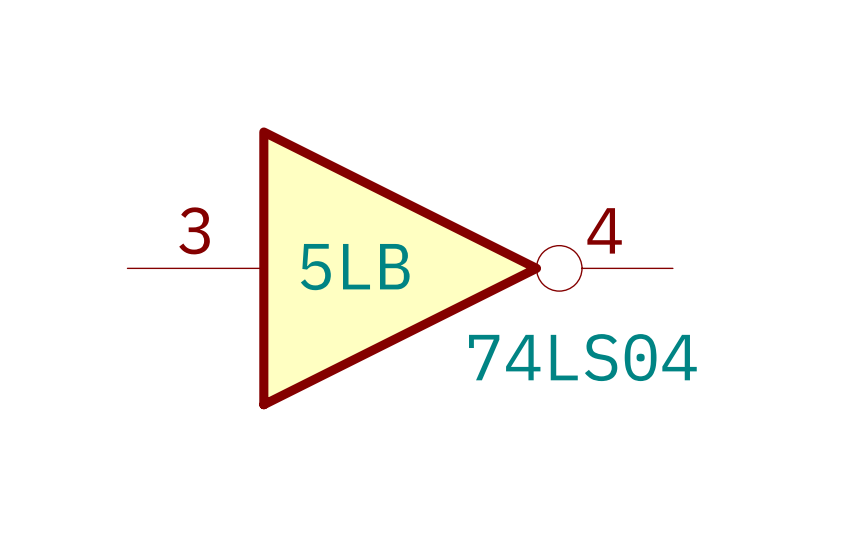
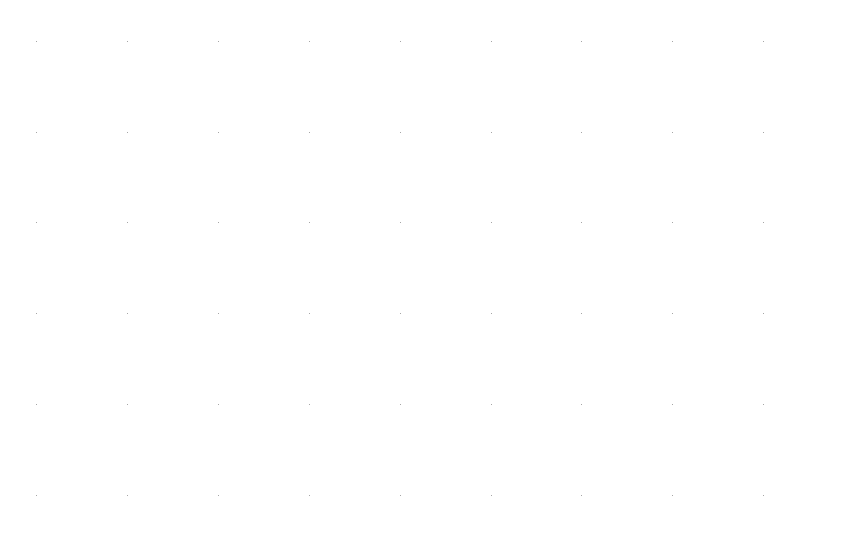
5LB: 74LS04 (400, 268) -> none

